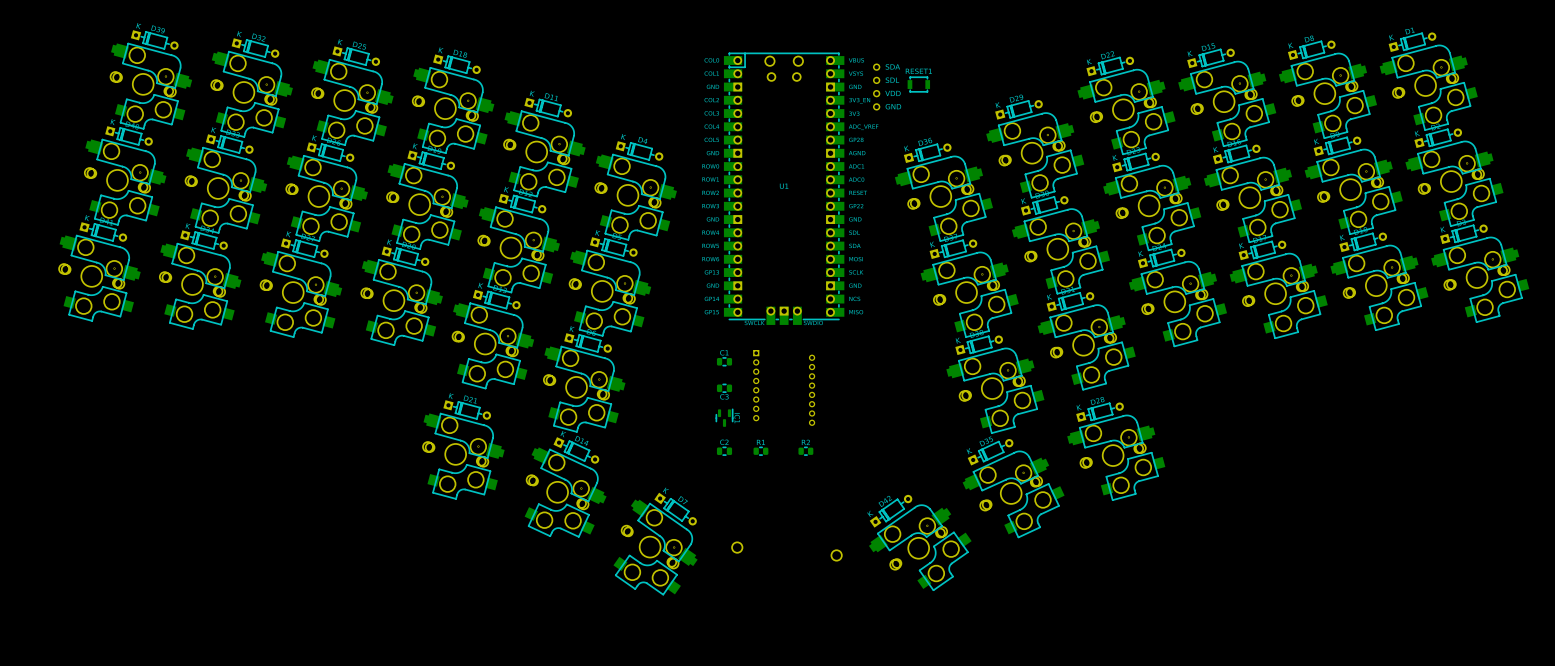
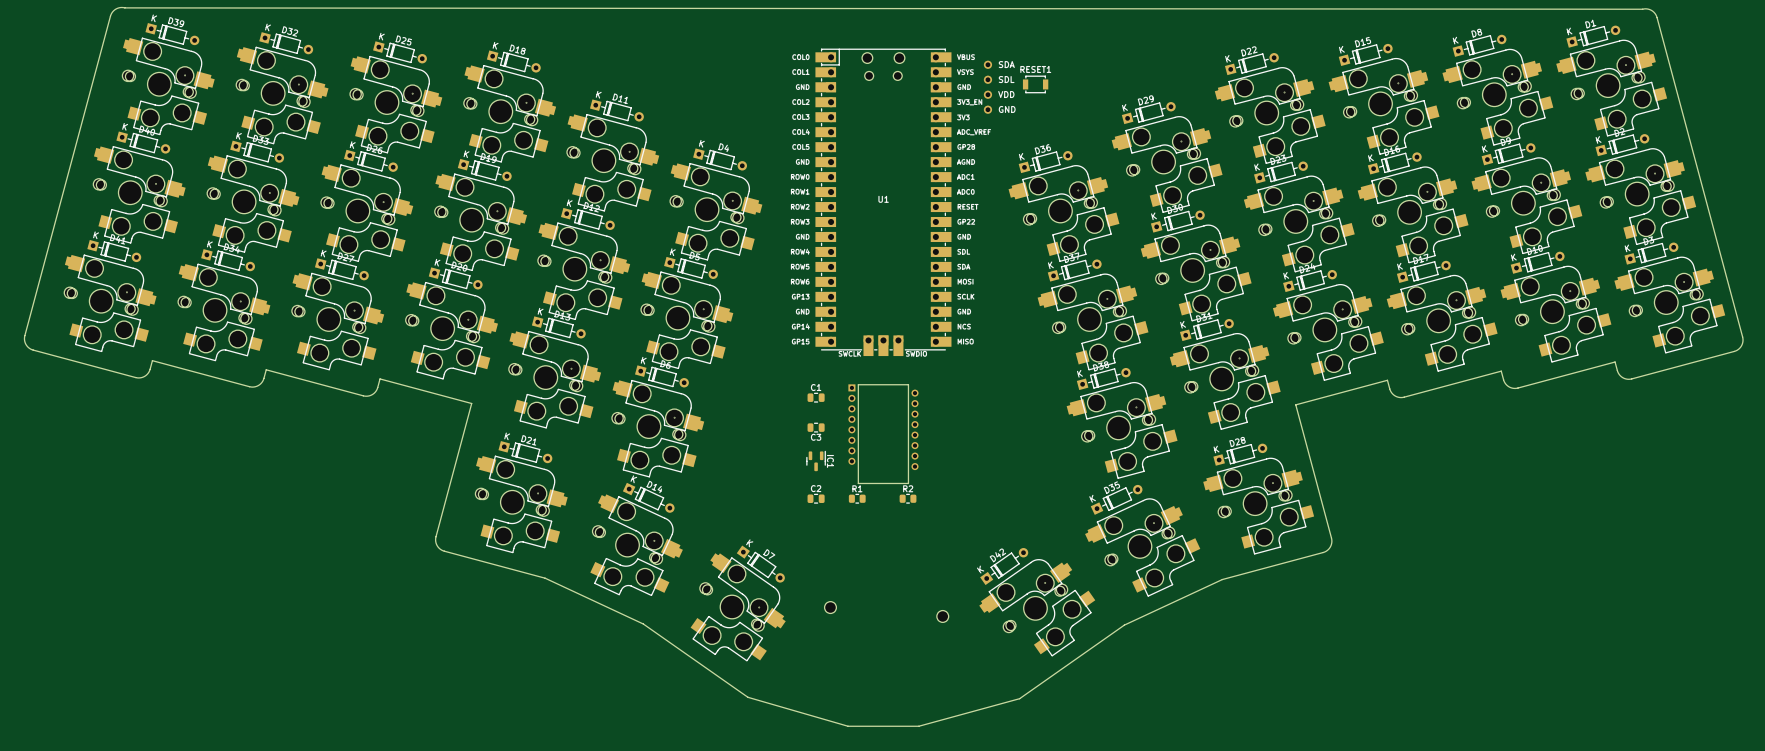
board edge: none -> (124, 7) (1648, 9) (1653, 12) (1657, 17) (1742, 337) (1742, 343) (1739, 348) (1734, 351) (1630, 379) (1620, 375) (1615, 362) (1516, 388) (1506, 384) (1501, 371) (1402, 397) (1392, 394) (1387, 380) (1295, 404) (1331, 538) (1330, 545) (1327, 550) (1222, 579) (1124, 625) (1019, 698) (918, 726) (848, 726) (747, 697) (643, 624) (545, 578) (440, 549) (436, 542) (436, 536) (471, 403) (380, 378) (375, 392) (364, 396) (266, 369) (260, 383) (251, 386) (152, 360) (147, 374) (137, 377) (33, 350) (27, 346) (24, 335) (110, 16) (115, 9) (124, 7)
board edge: none -> (908, 384) (858, 384) (858, 483) (908, 483) (908, 384)

